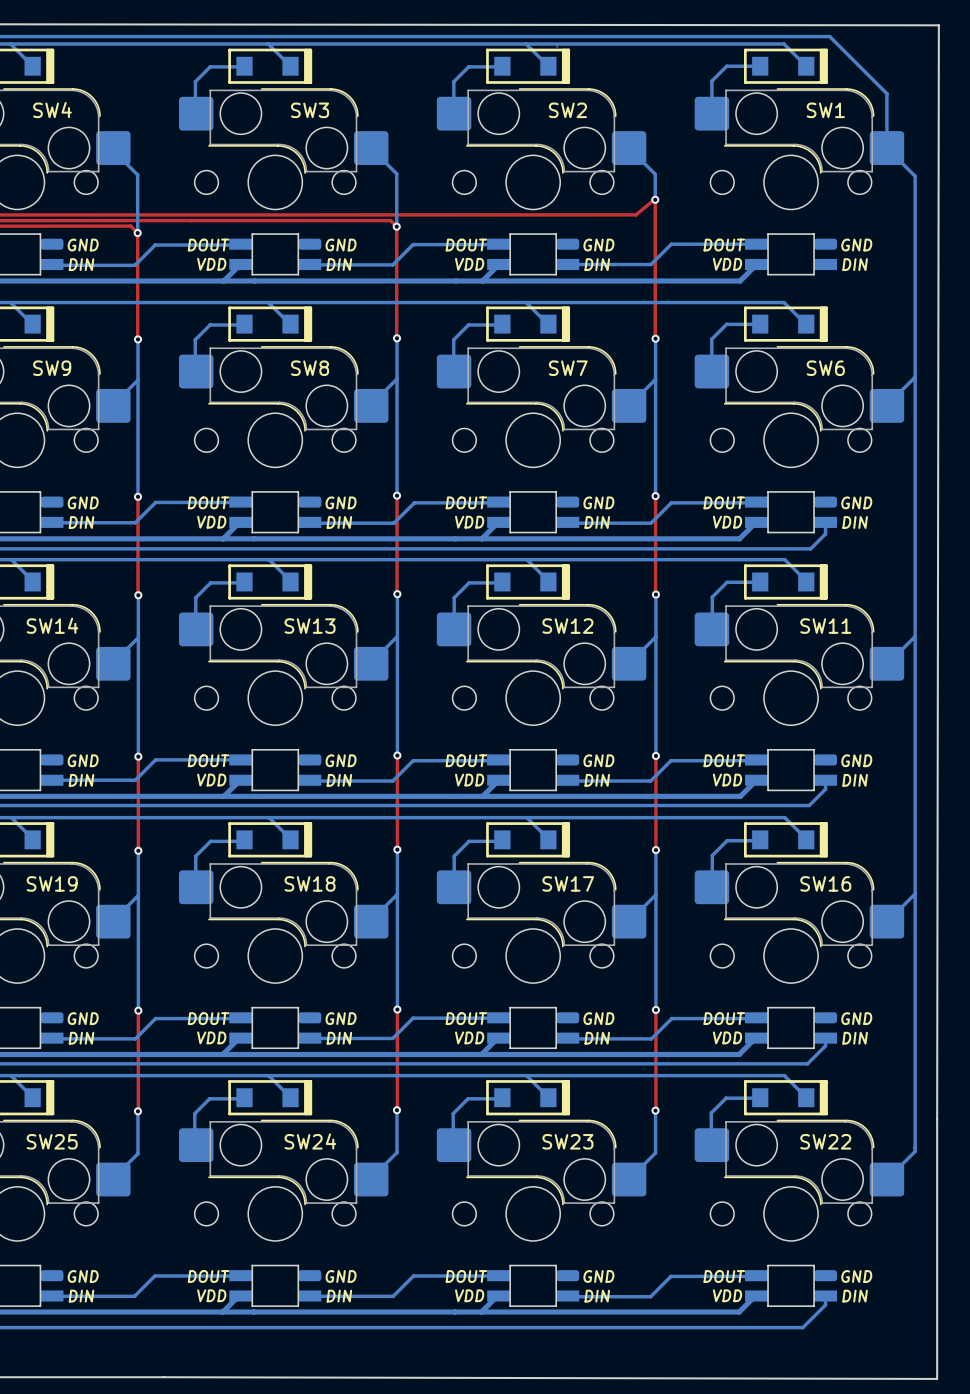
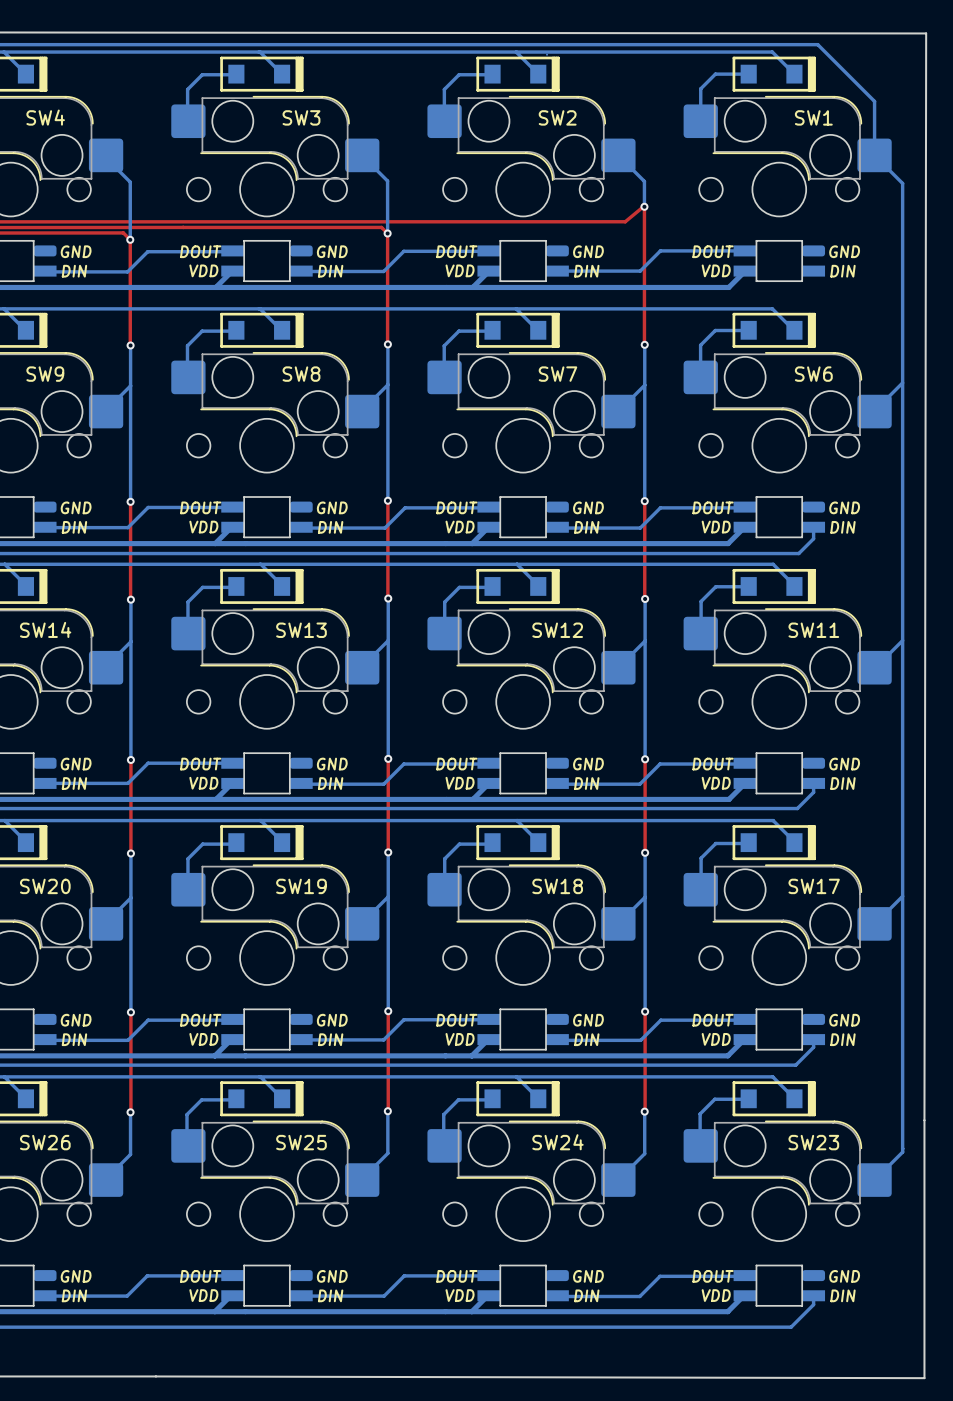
SW19 name: SW19 (52, 883) -> SW20 (45, 886)
SW18 name: SW18 (310, 883) -> SW19 (301, 886)
SW17 name: SW17 (568, 883) -> SW18 (557, 886)
SW16 name: SW16 (825, 883) -> SW17 (814, 886)
SW25 name: SW25 (52, 1141) -> SW26 (45, 1142)
SW24 name: SW24 (310, 1141) -> SW25 (301, 1142)
SW23 name: SW23 (567, 1141) -> SW24 (557, 1142)
SW22 name: SW22 (825, 1141) -> SW23 (813, 1142)

